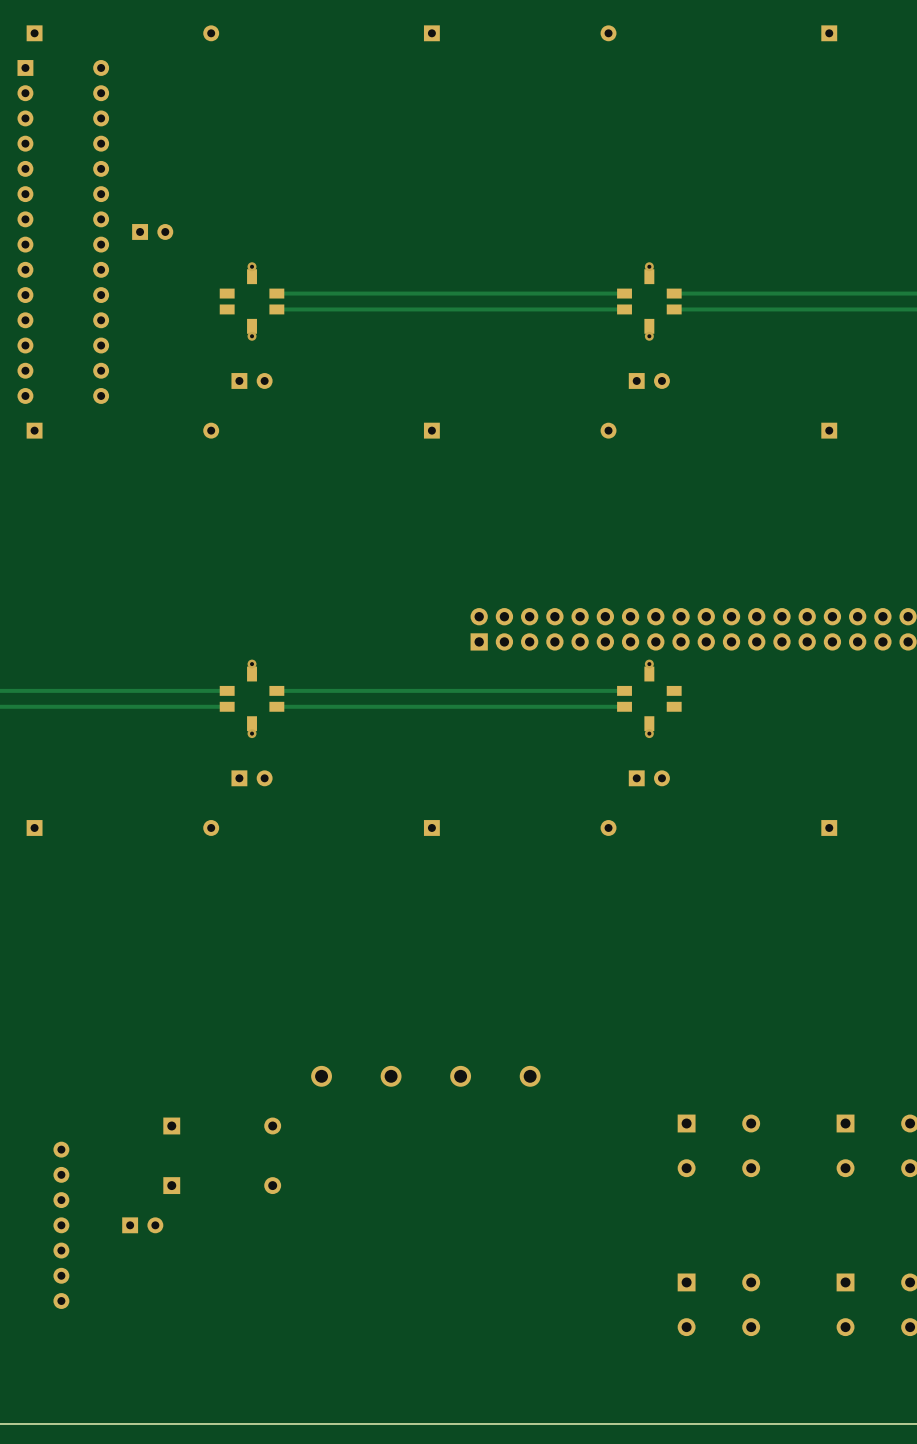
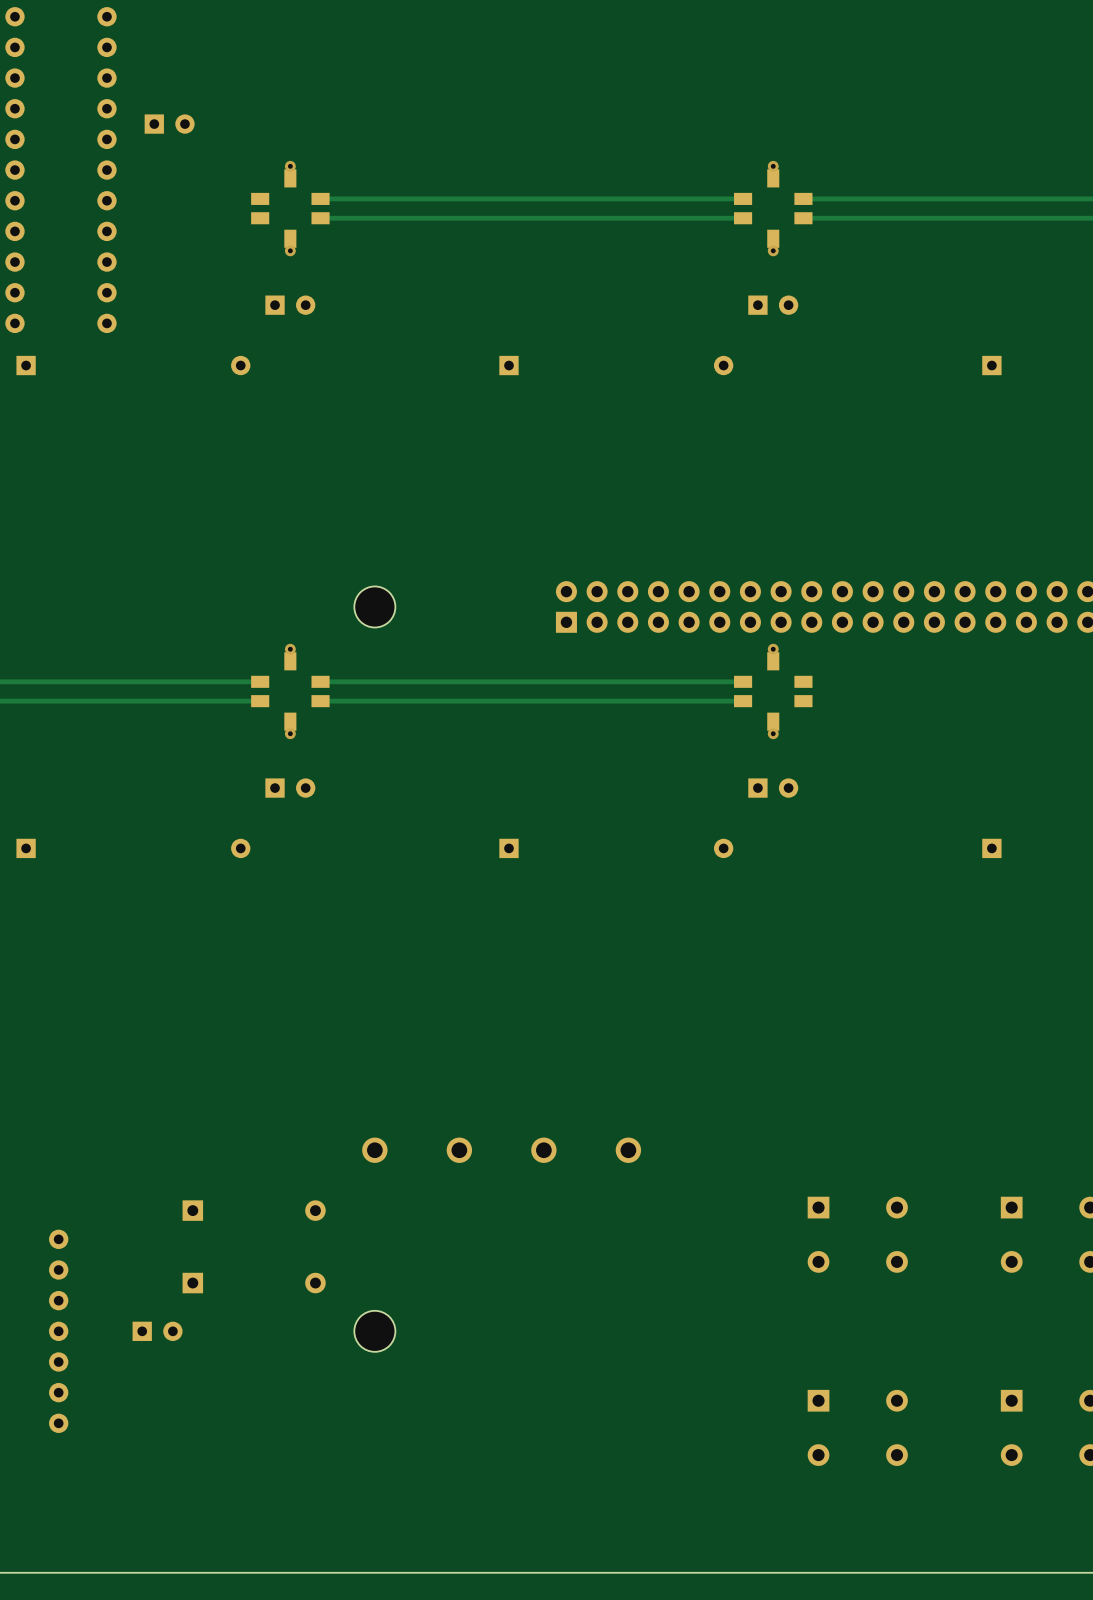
part: none -> (374, 606)
part: none -> (374, 1331)

